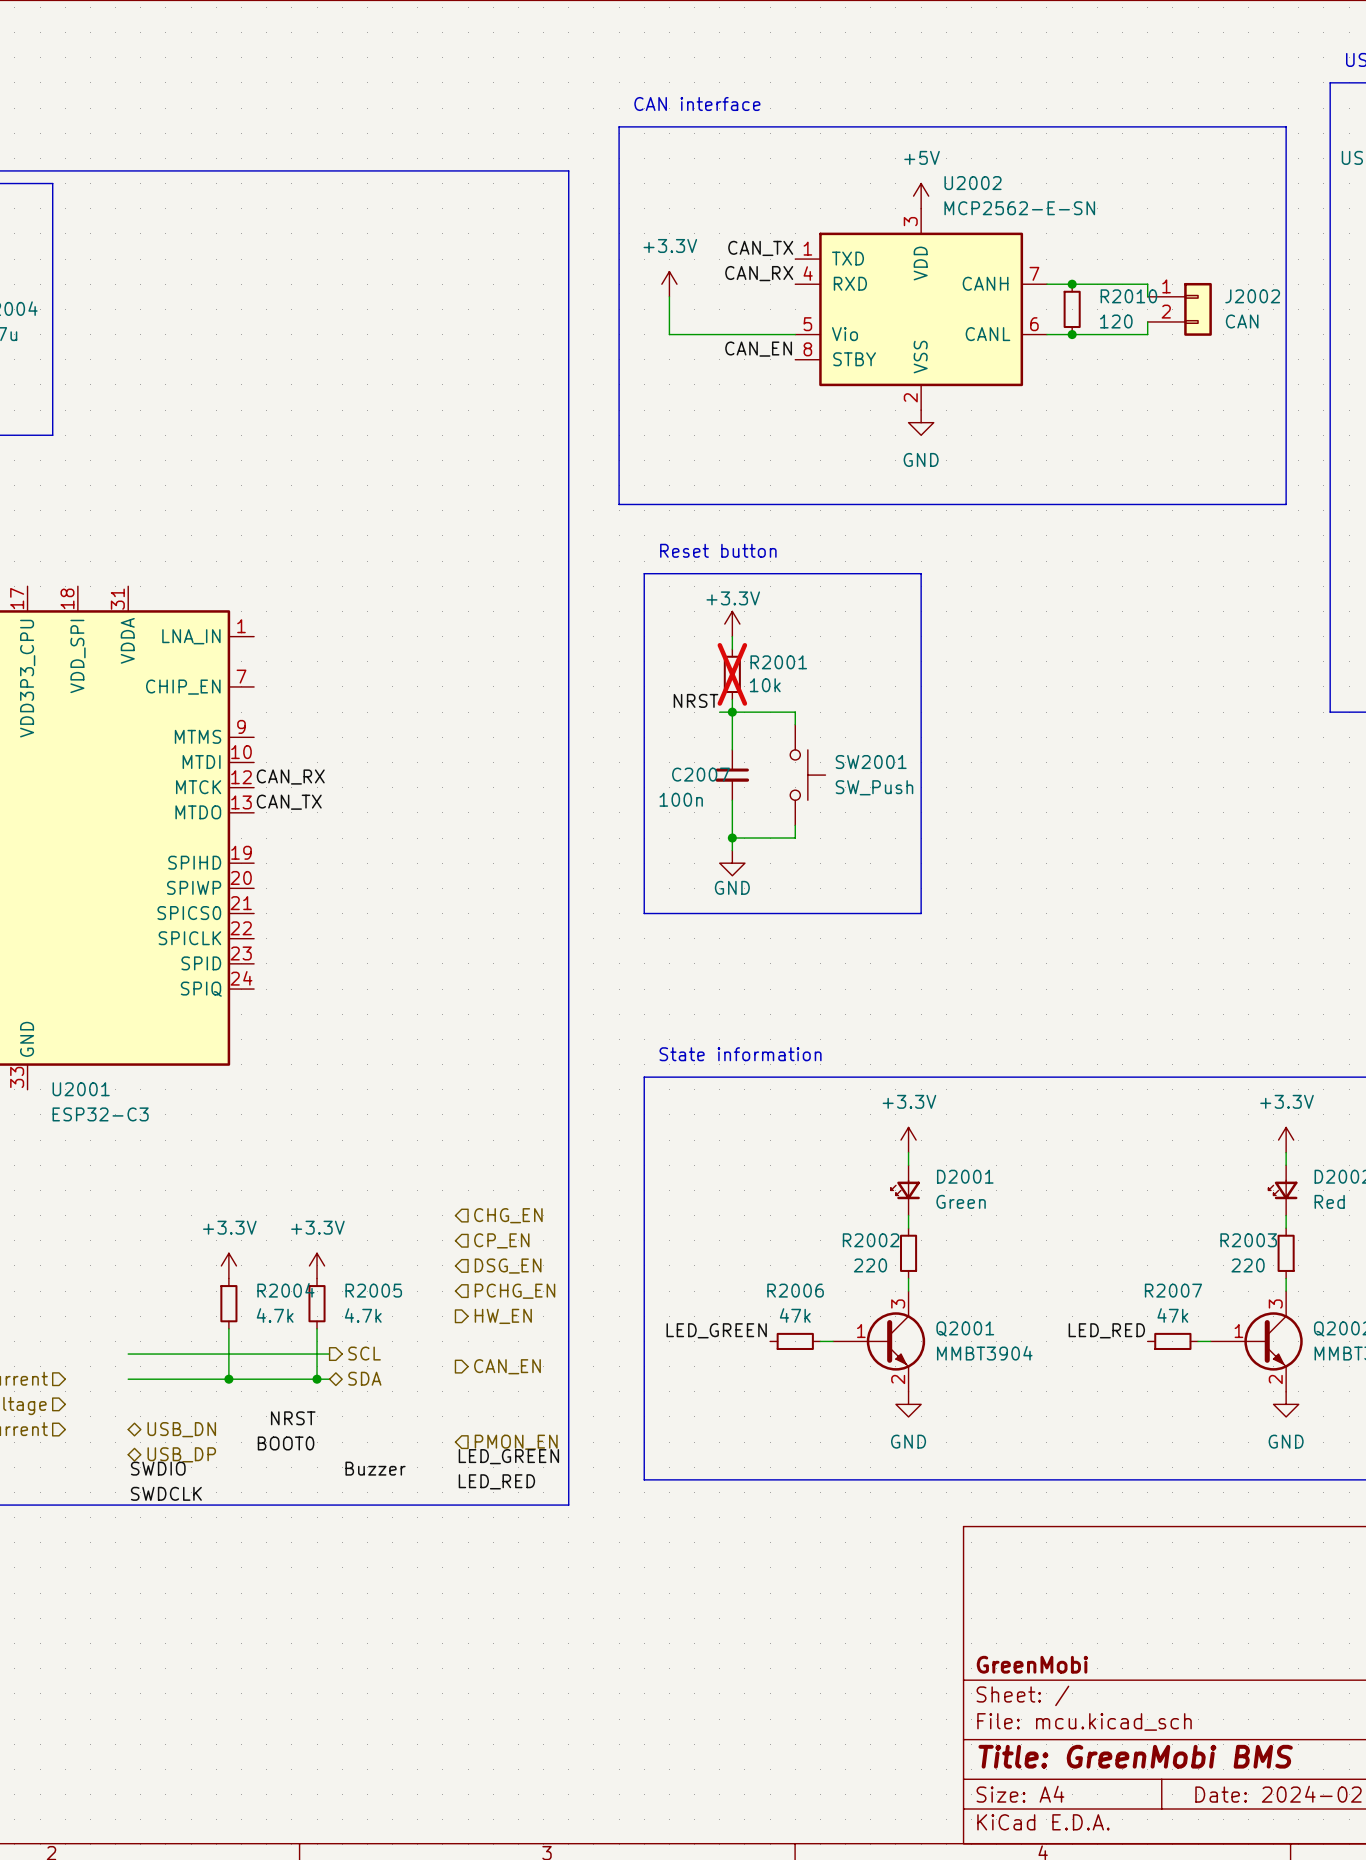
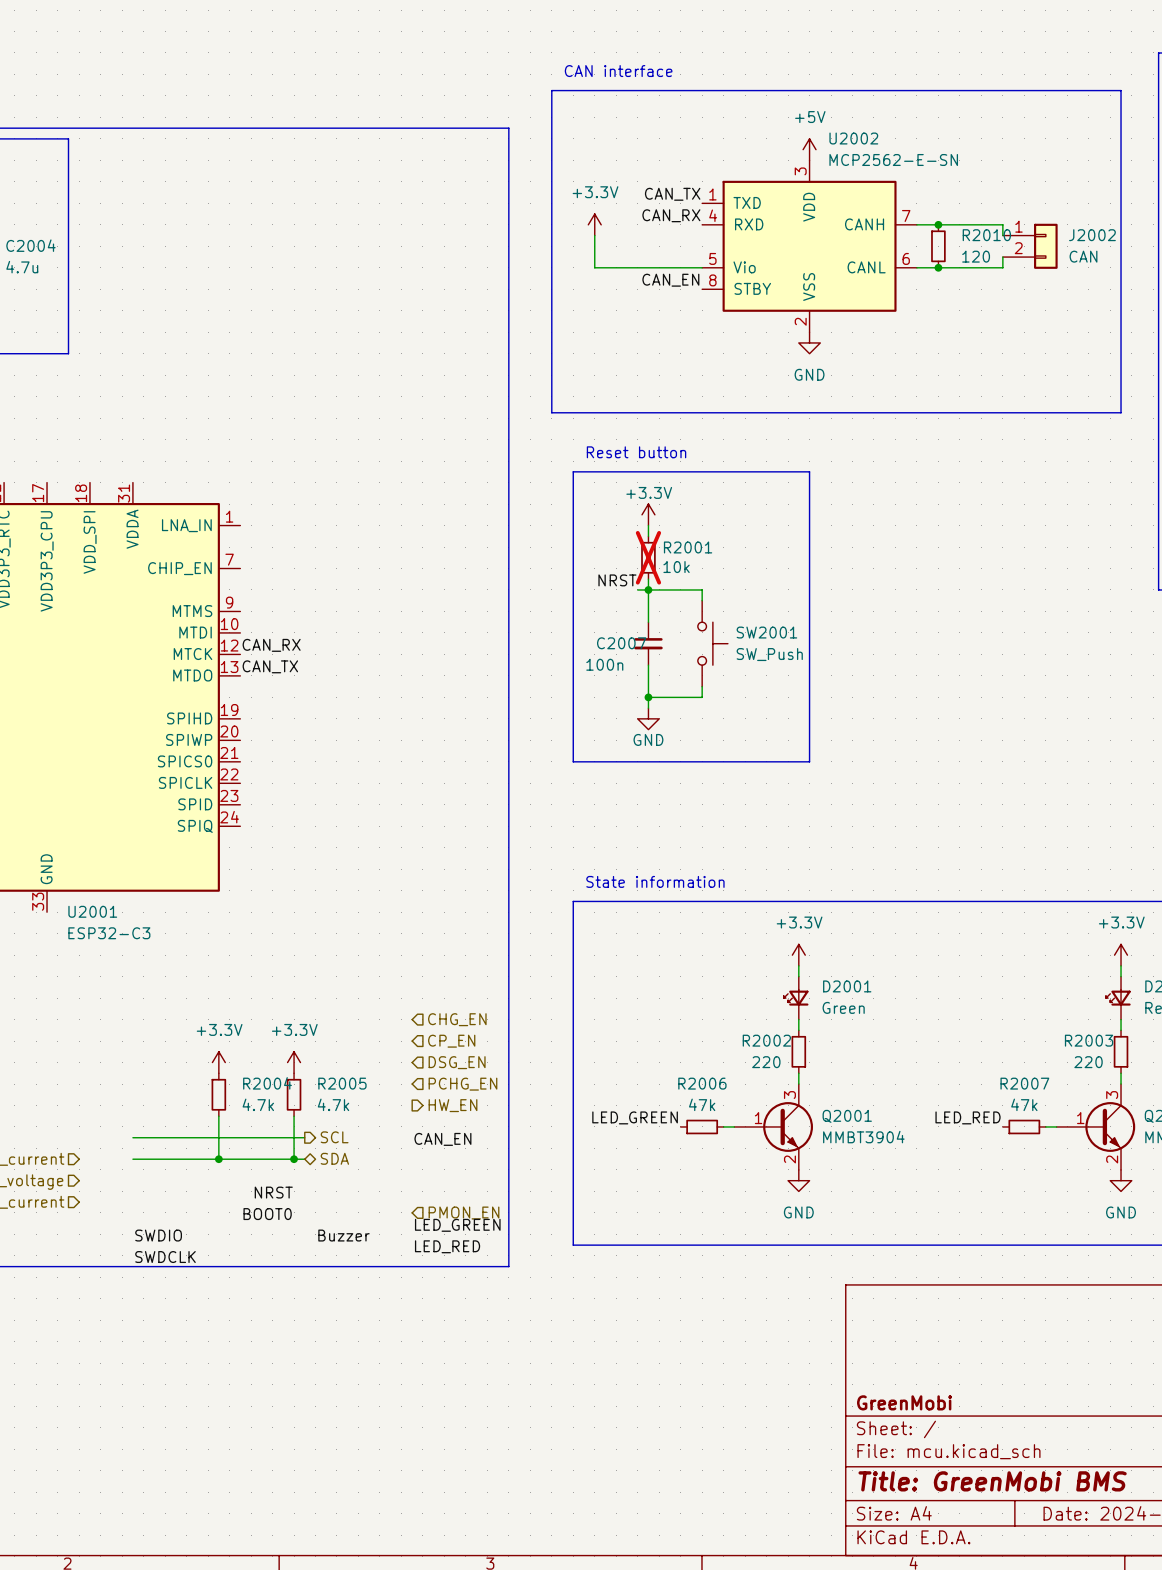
label: none -> CAN_EN (442, 1139)
hierarchical label: CAN_EN (507, 1366) -> none
hierarchical label: USB_DN (181, 1429) -> none
hierarchical label: USB_DP (181, 1454) -> none

